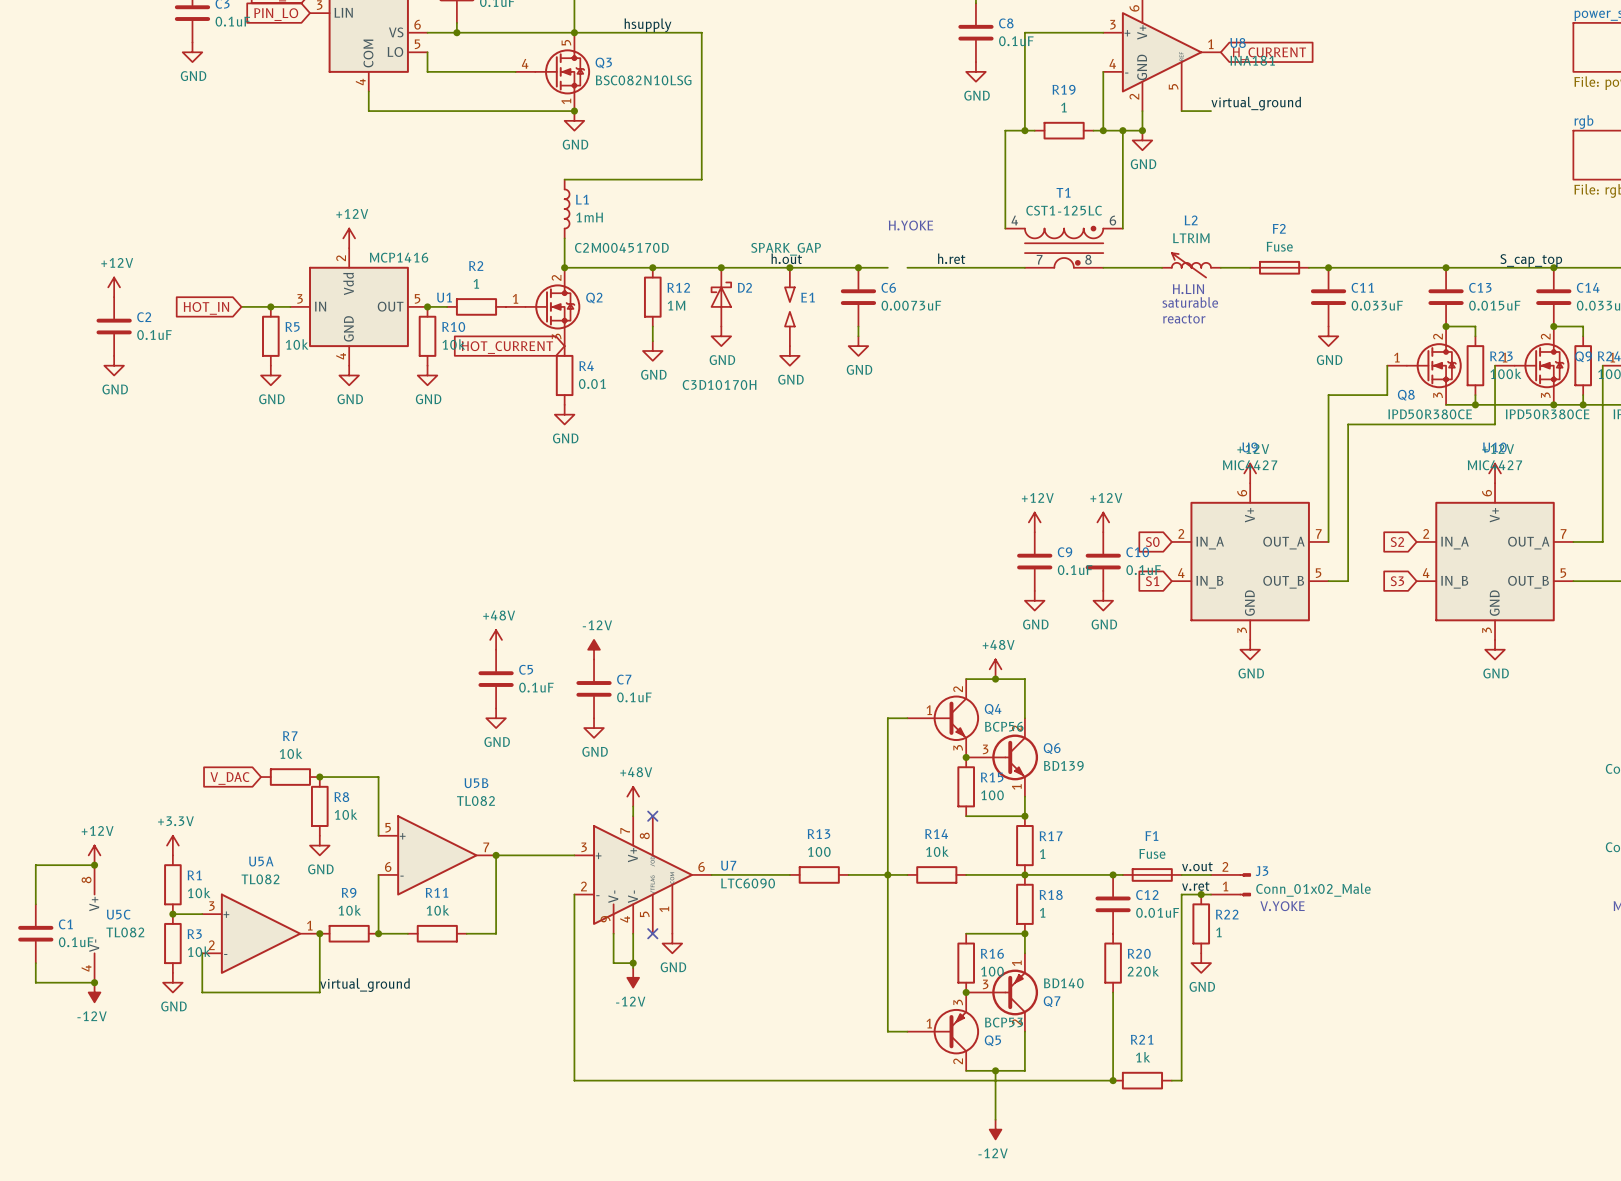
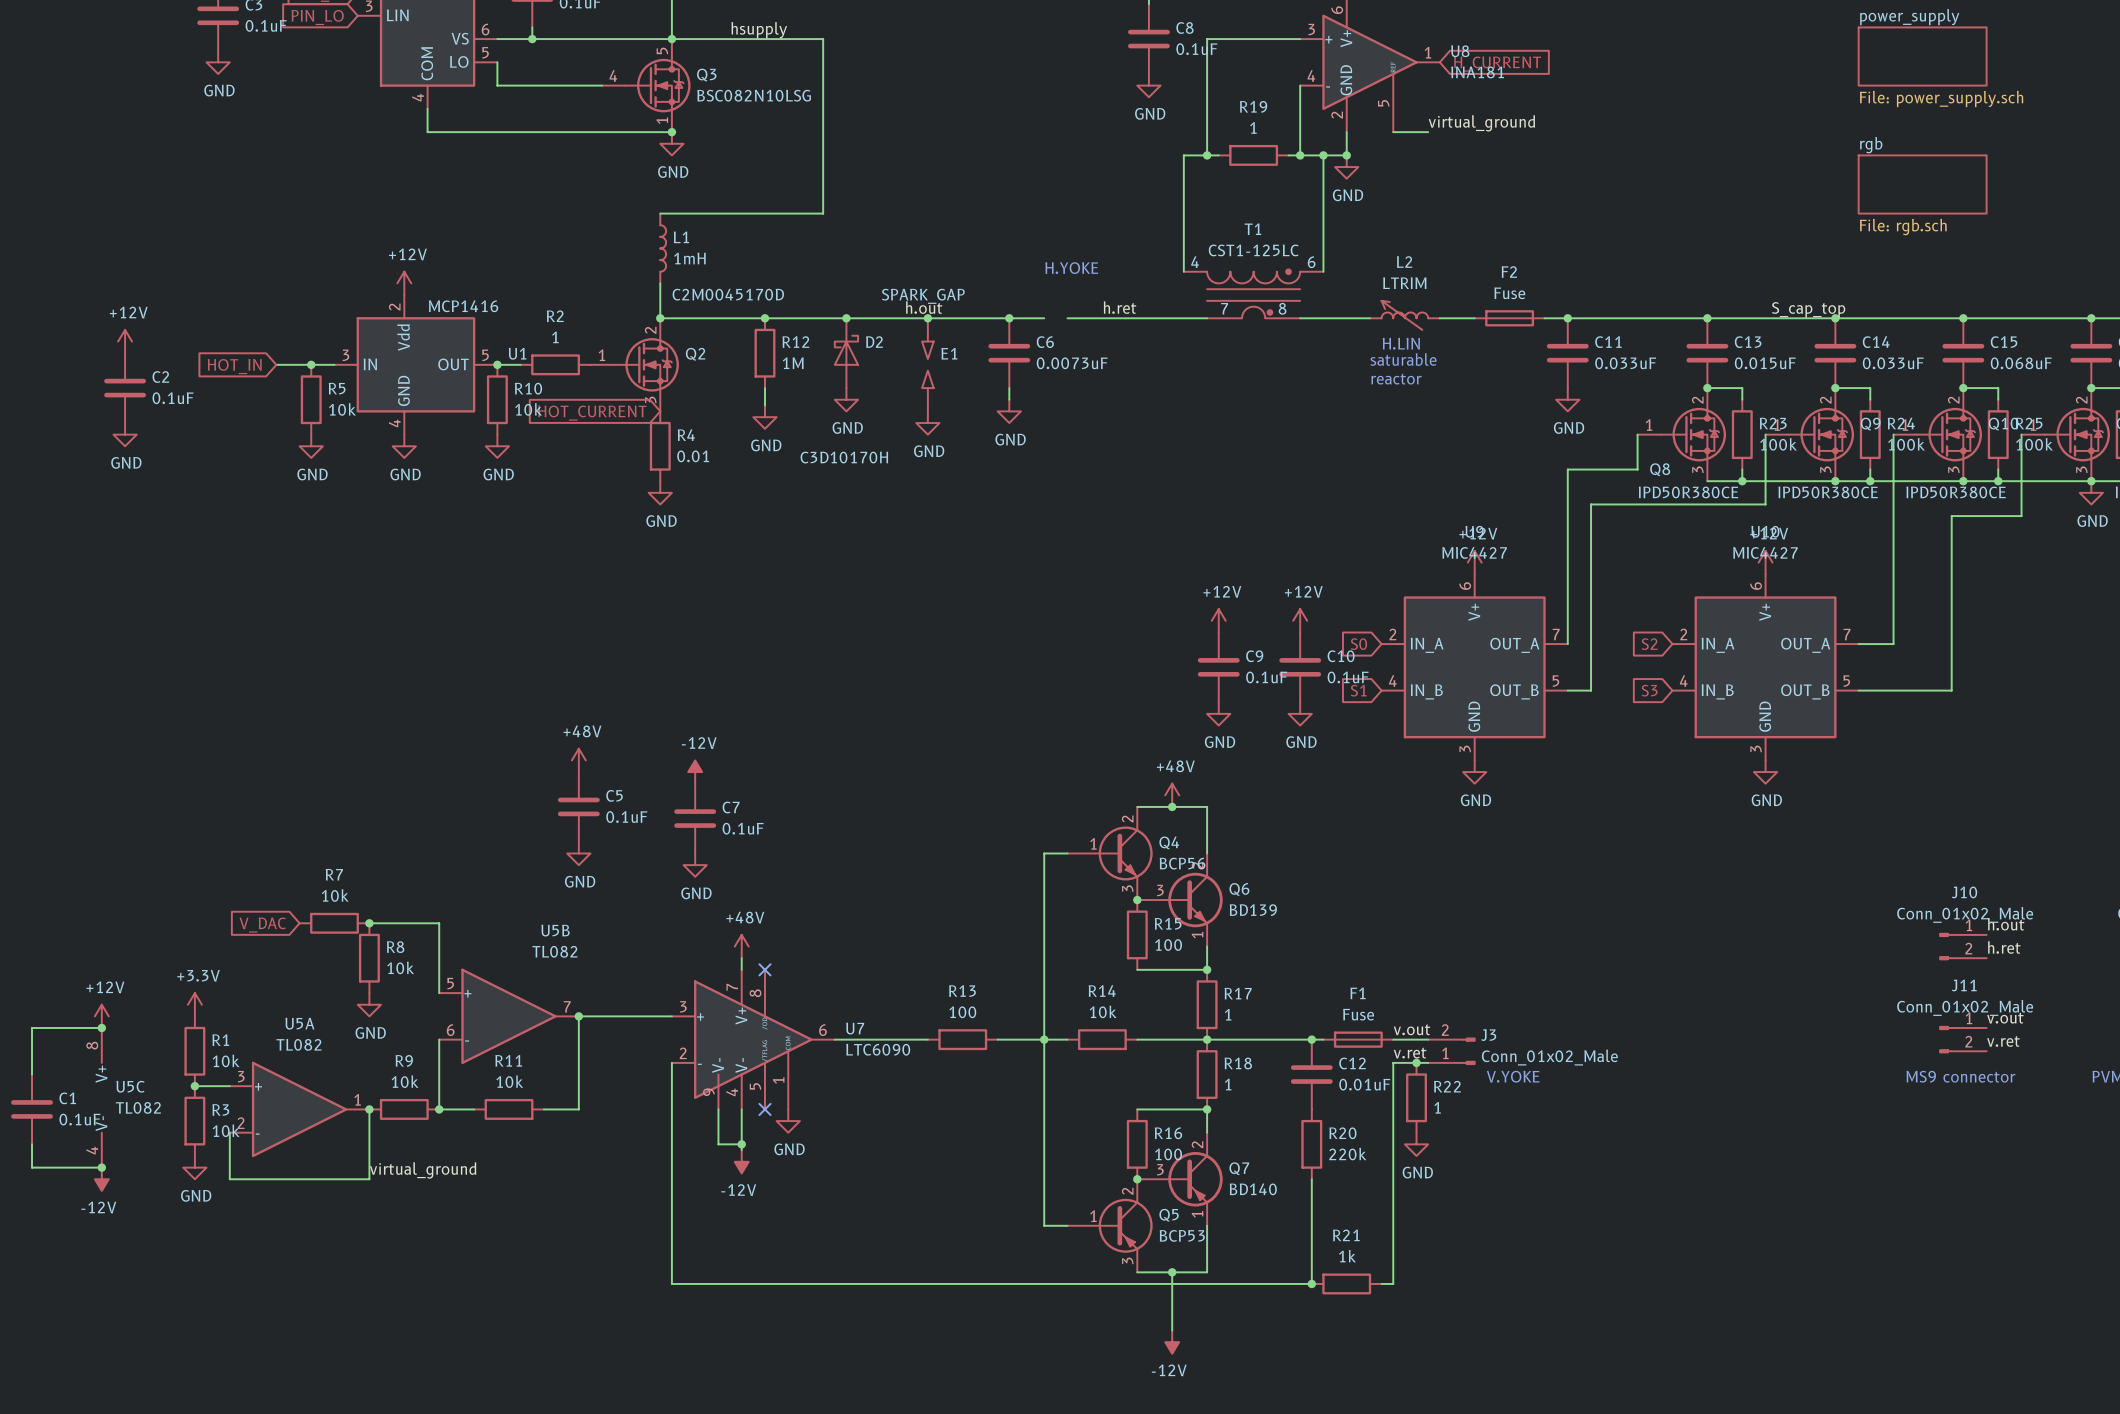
Q7 flip: as is (1015, 992) -> up-down (1195, 1179)
Q5 flip: as is (956, 1031) -> up-down (1125, 1225)

